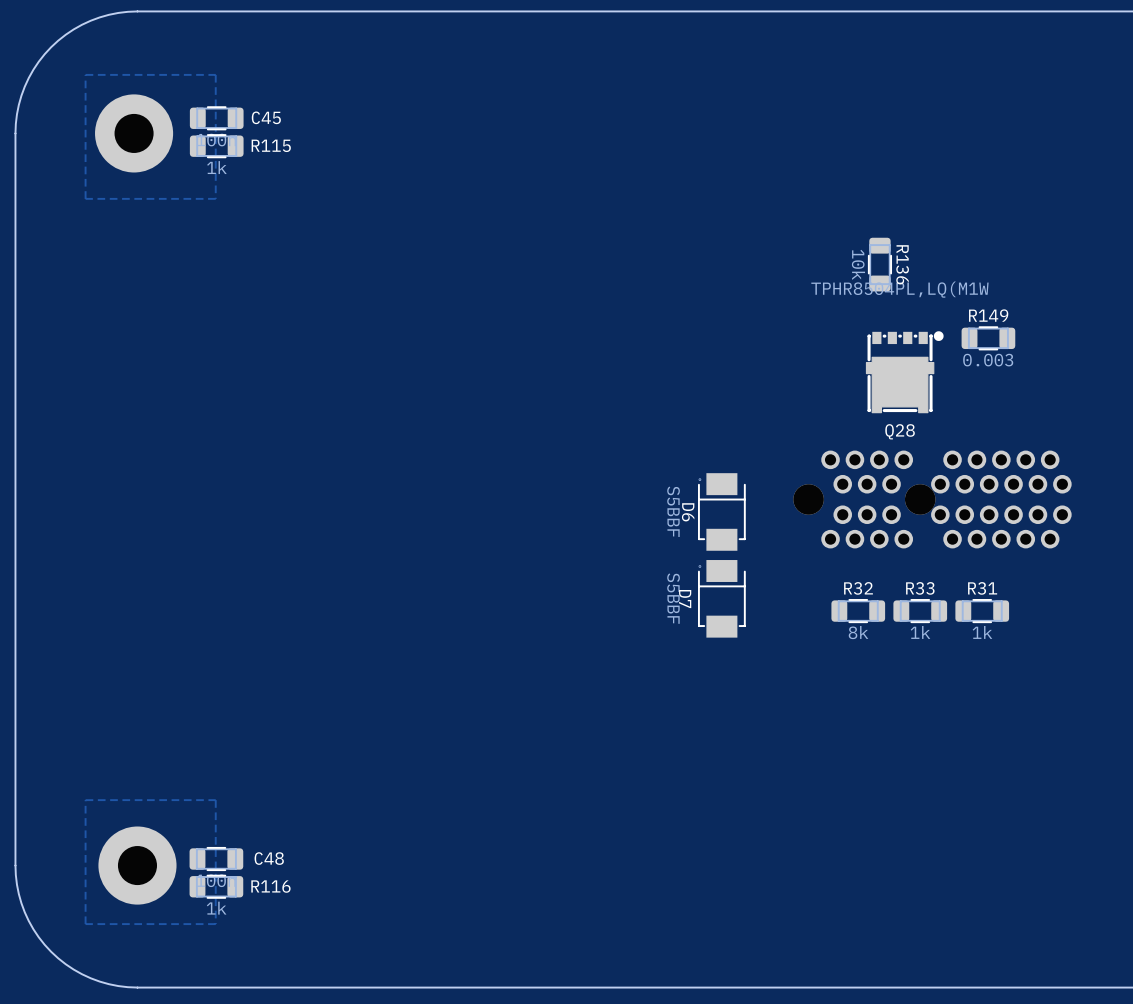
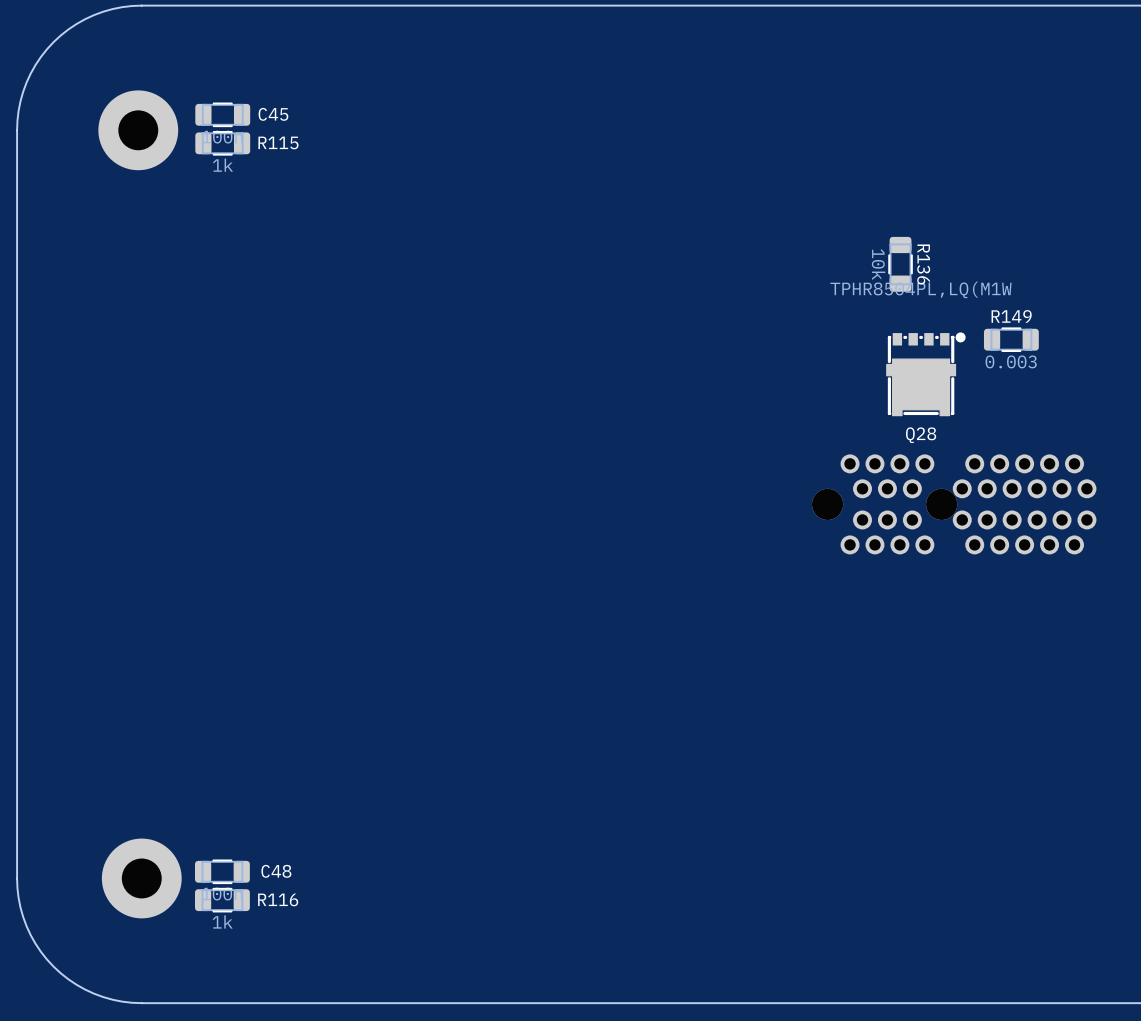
zone outline: (215, 74) (215, 198) (85, 198) (85, 74) (215, 74) -> none
D6: S5BBF (721, 511) -> none
D7: S5BBF (721, 598) -> none
R32: 8k (858, 611) -> none
R33: 1k (920, 611) -> none
R31: 1k (982, 611) -> none
zone outline: (215, 800) (215, 924) (85, 924) (85, 800) (215, 800) -> none

